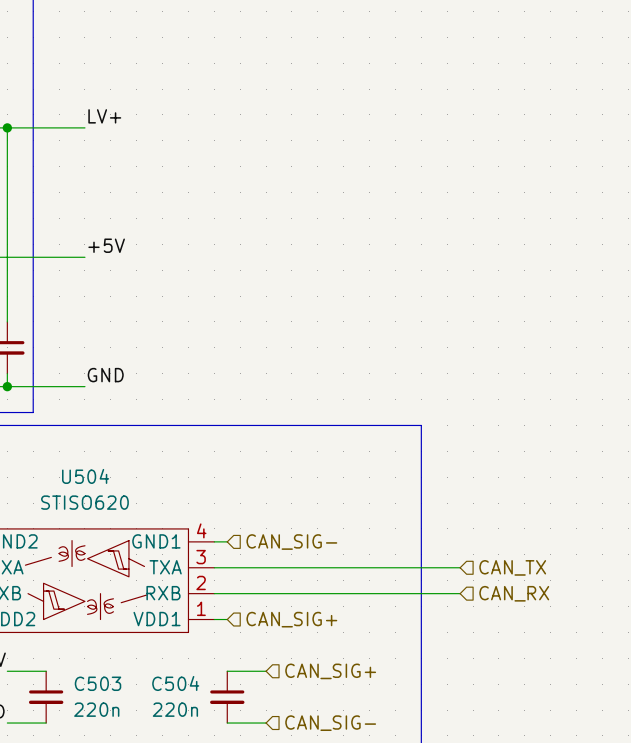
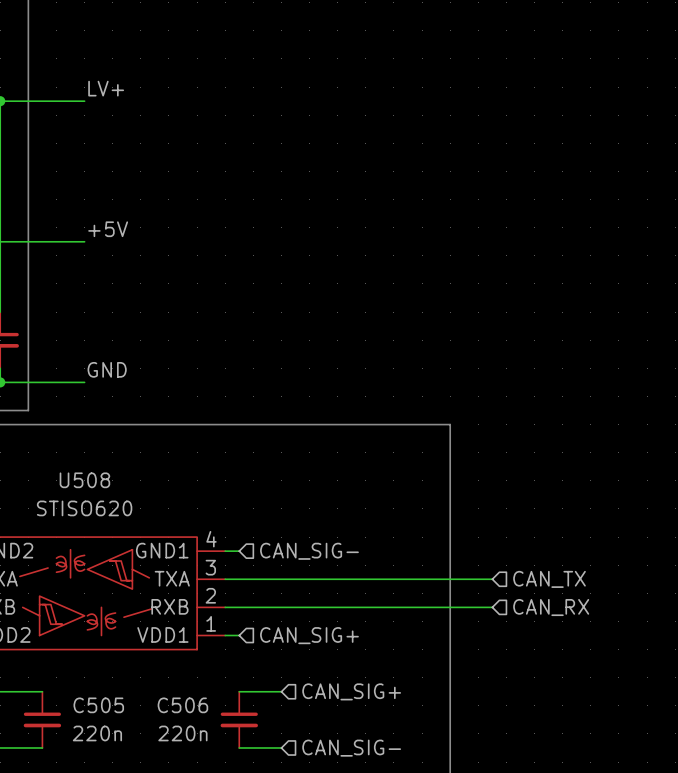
U504 name: U504 (85, 476) -> U508 (84, 480)
C503 name: C503 (98, 683) -> C505 (98, 705)
C504 name: C504 (175, 683) -> C506 (182, 705)

